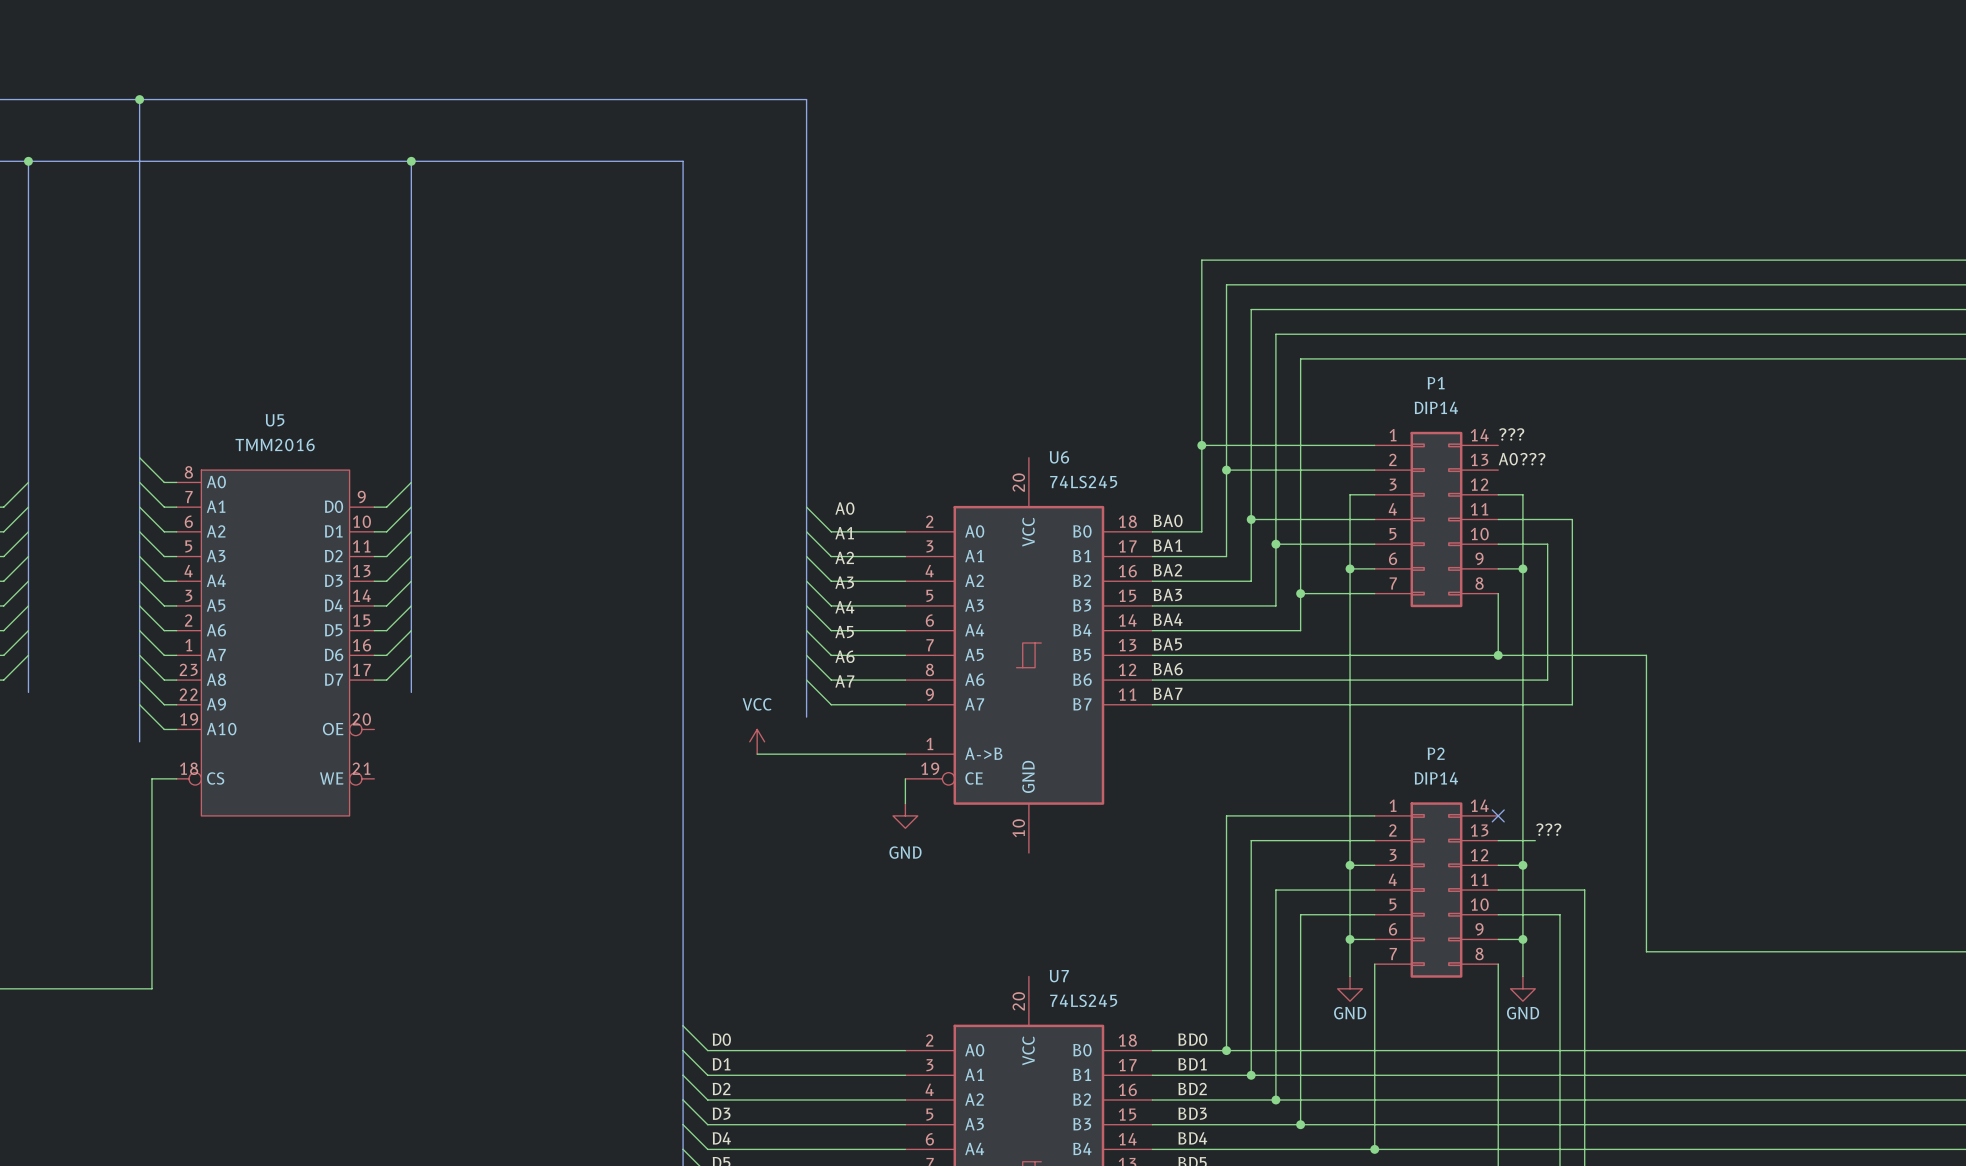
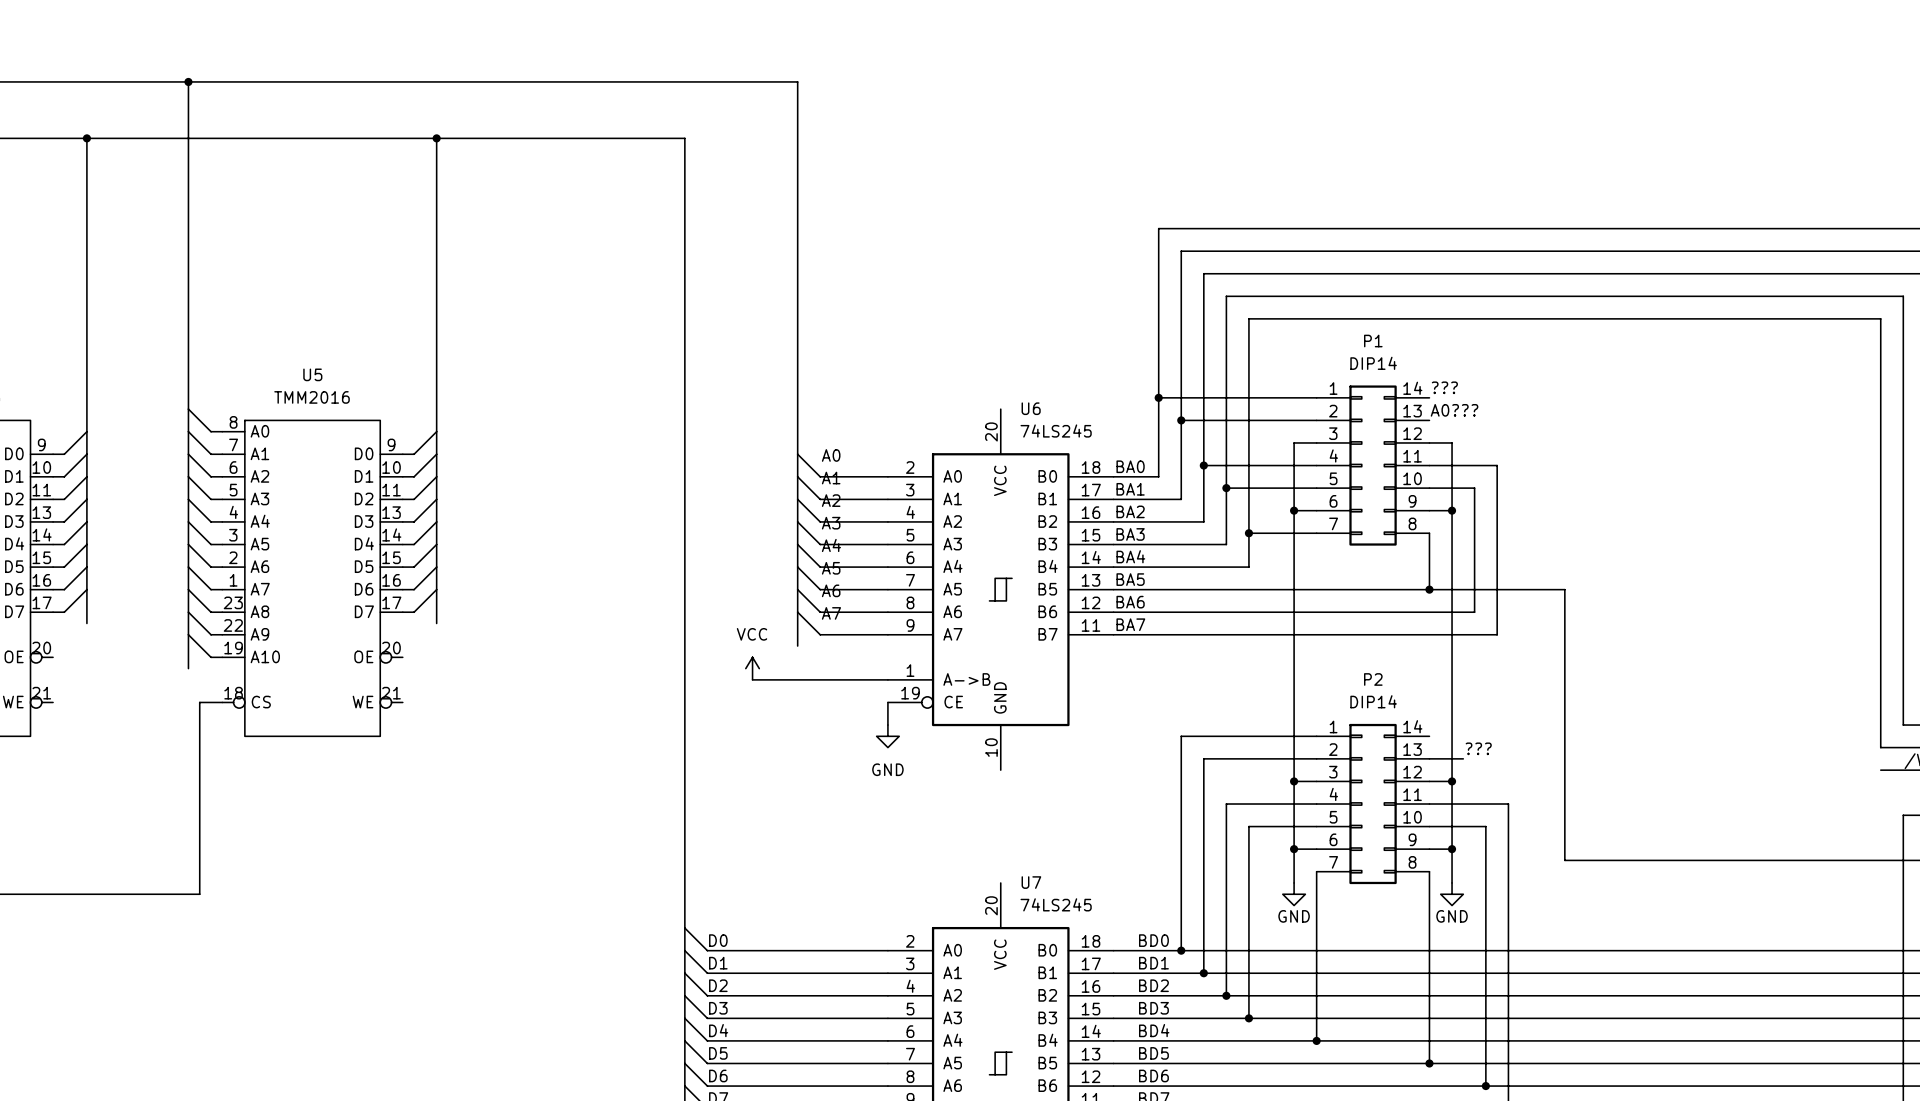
no-connect mark: (1498, 815) -> none

